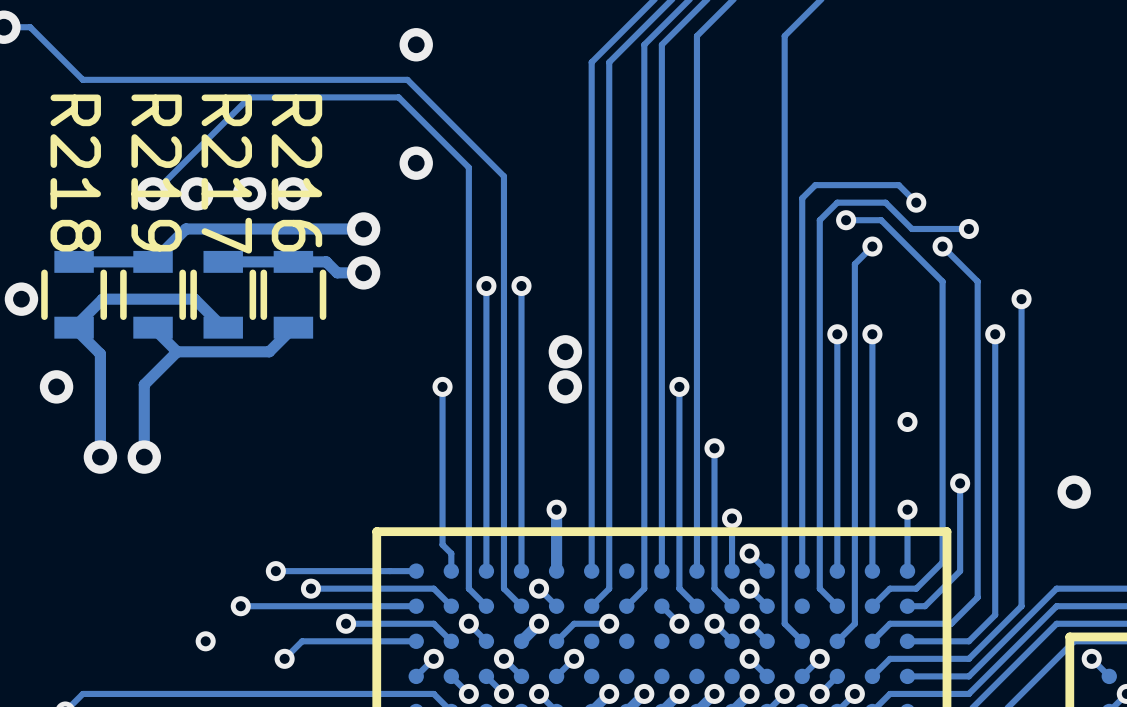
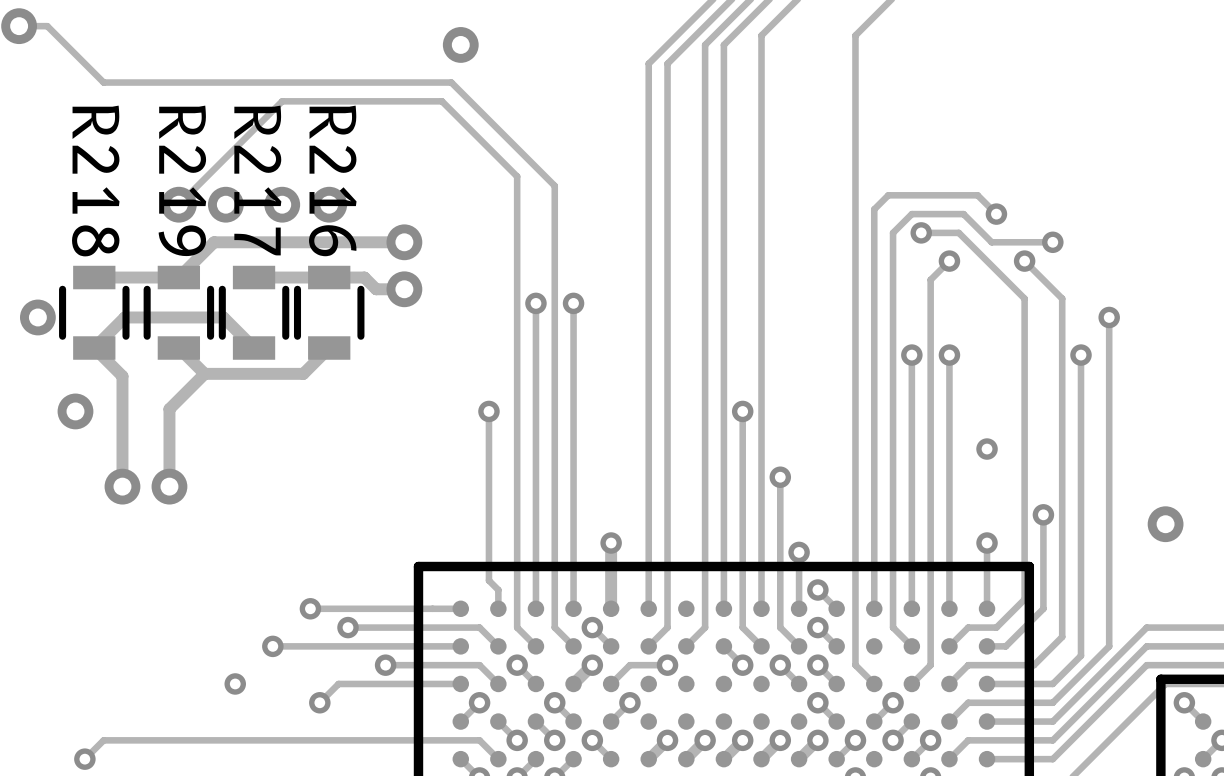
via: (416, 163) -> none
via: (565, 351) -> none
via: (565, 386) -> none

